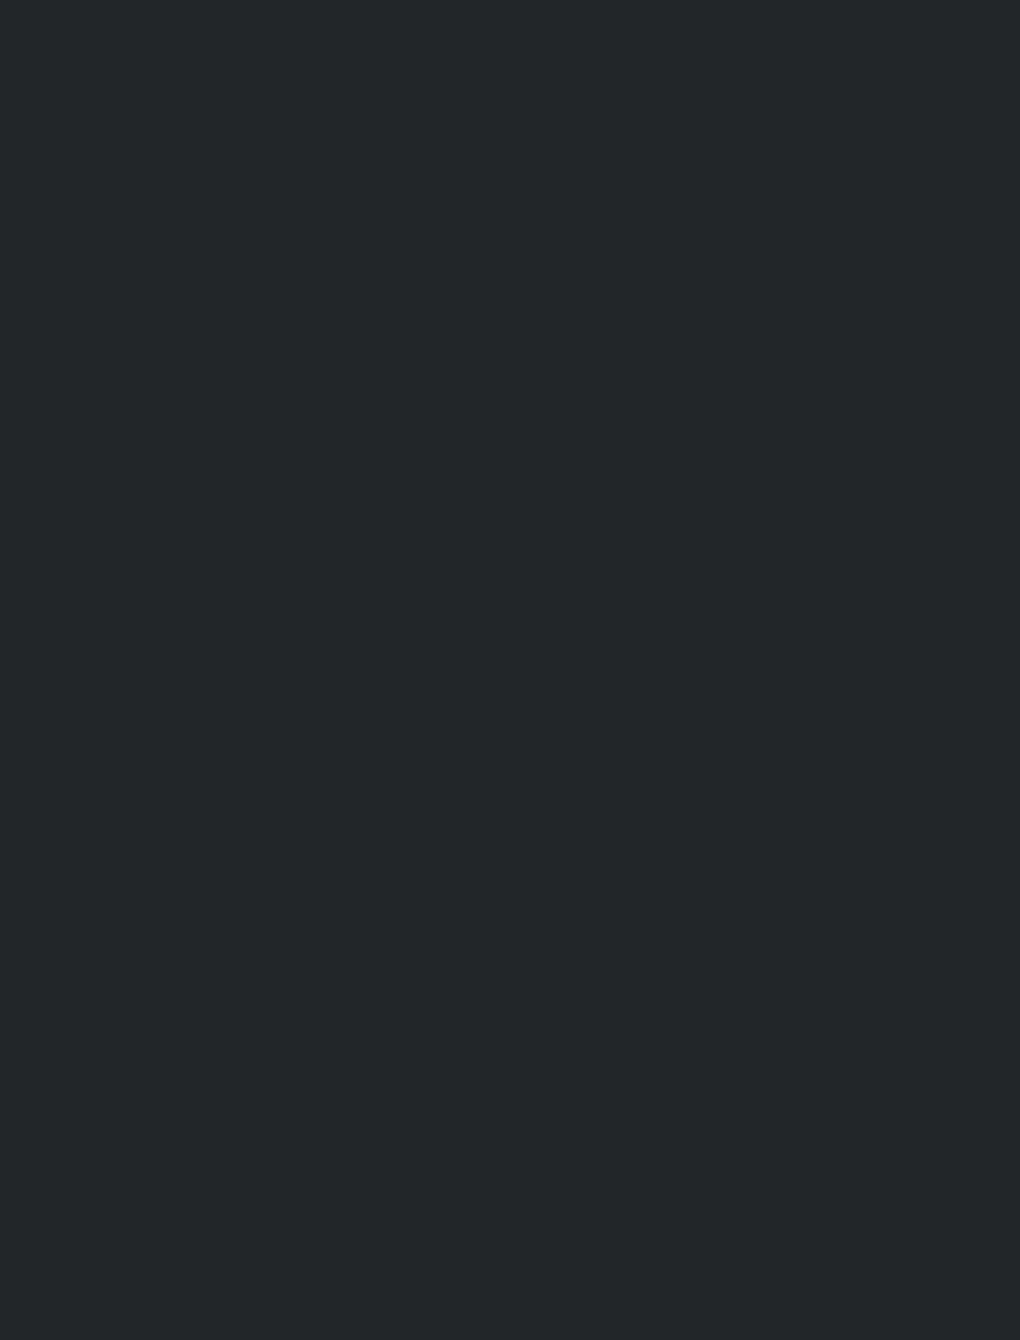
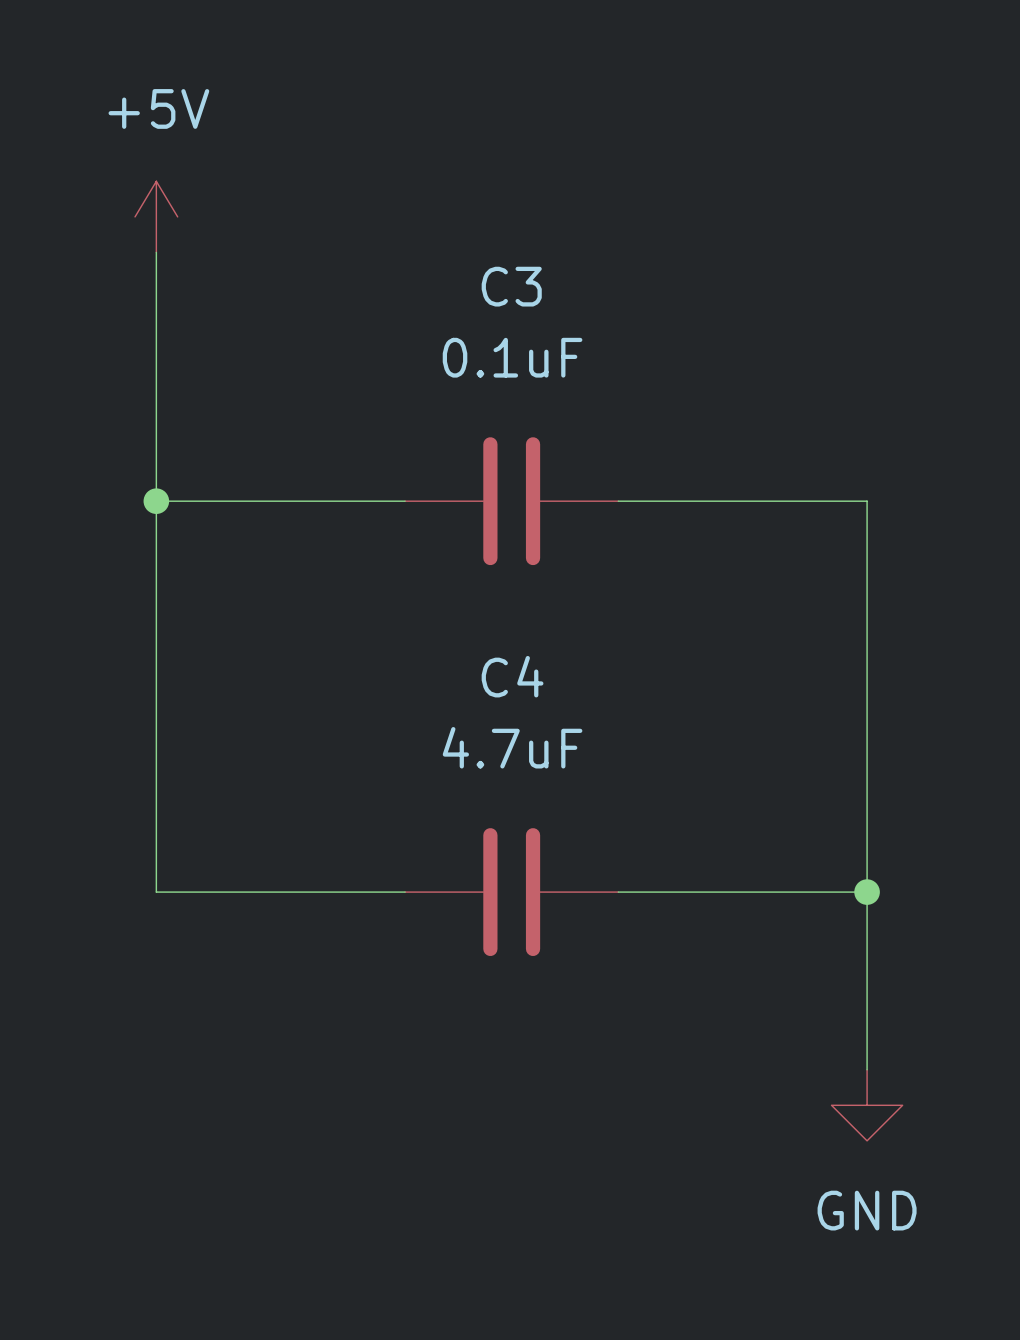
power symbol: none -> +5V (156, 216)
wire: none -> (156, 252) (156, 892) (405, 892)
wire: none -> (156, 501) (405, 501)
junction: none -> (156, 501)
C3: none -> 0.1uF (511, 501)
wire: none -> (618, 501) (867, 501) (867, 1069)
C4: none -> 4.7uF (511, 892)
wire: none -> (618, 892) (867, 892)
junction: none -> (867, 892)
power symbol: none -> GND (867, 1105)

